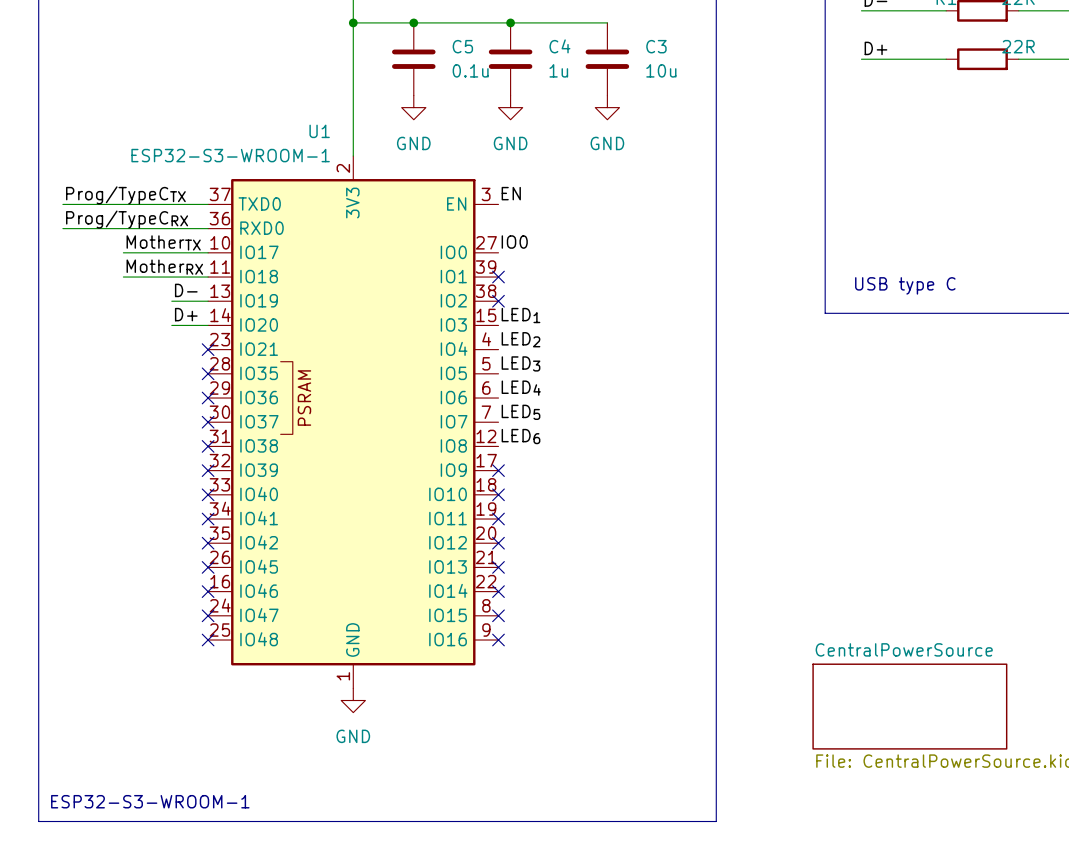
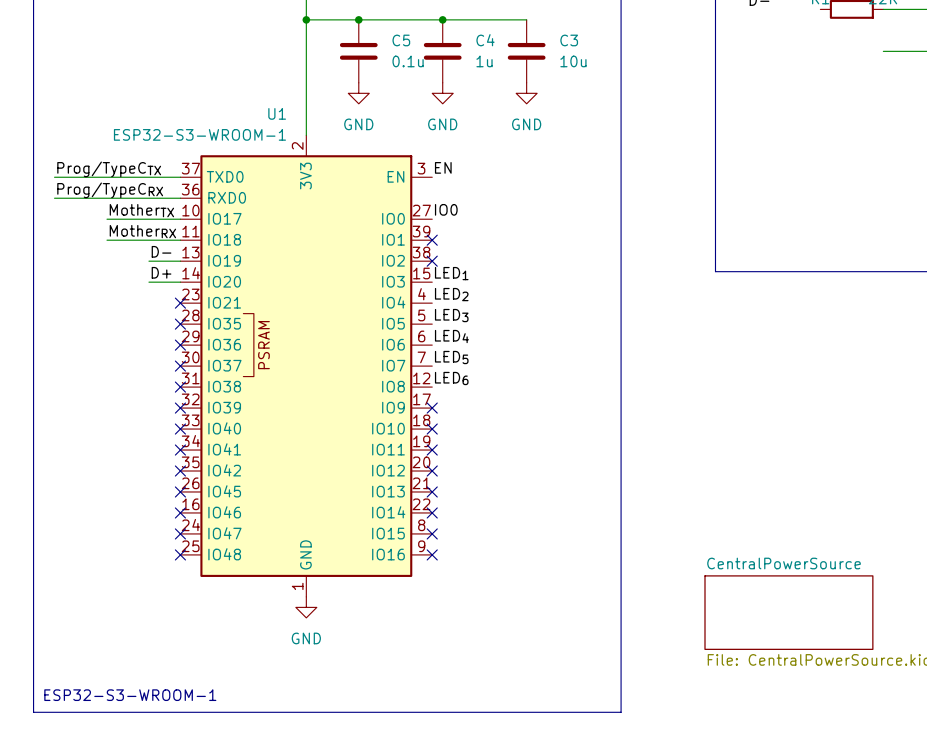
wire: (861, 10) (946, 10) -> none
label: D+ (875, 48) -> none
wire: (861, 59) (946, 59) -> none
part: 22R (982, 59) -> none
text: USB type C (905, 285) -> none

